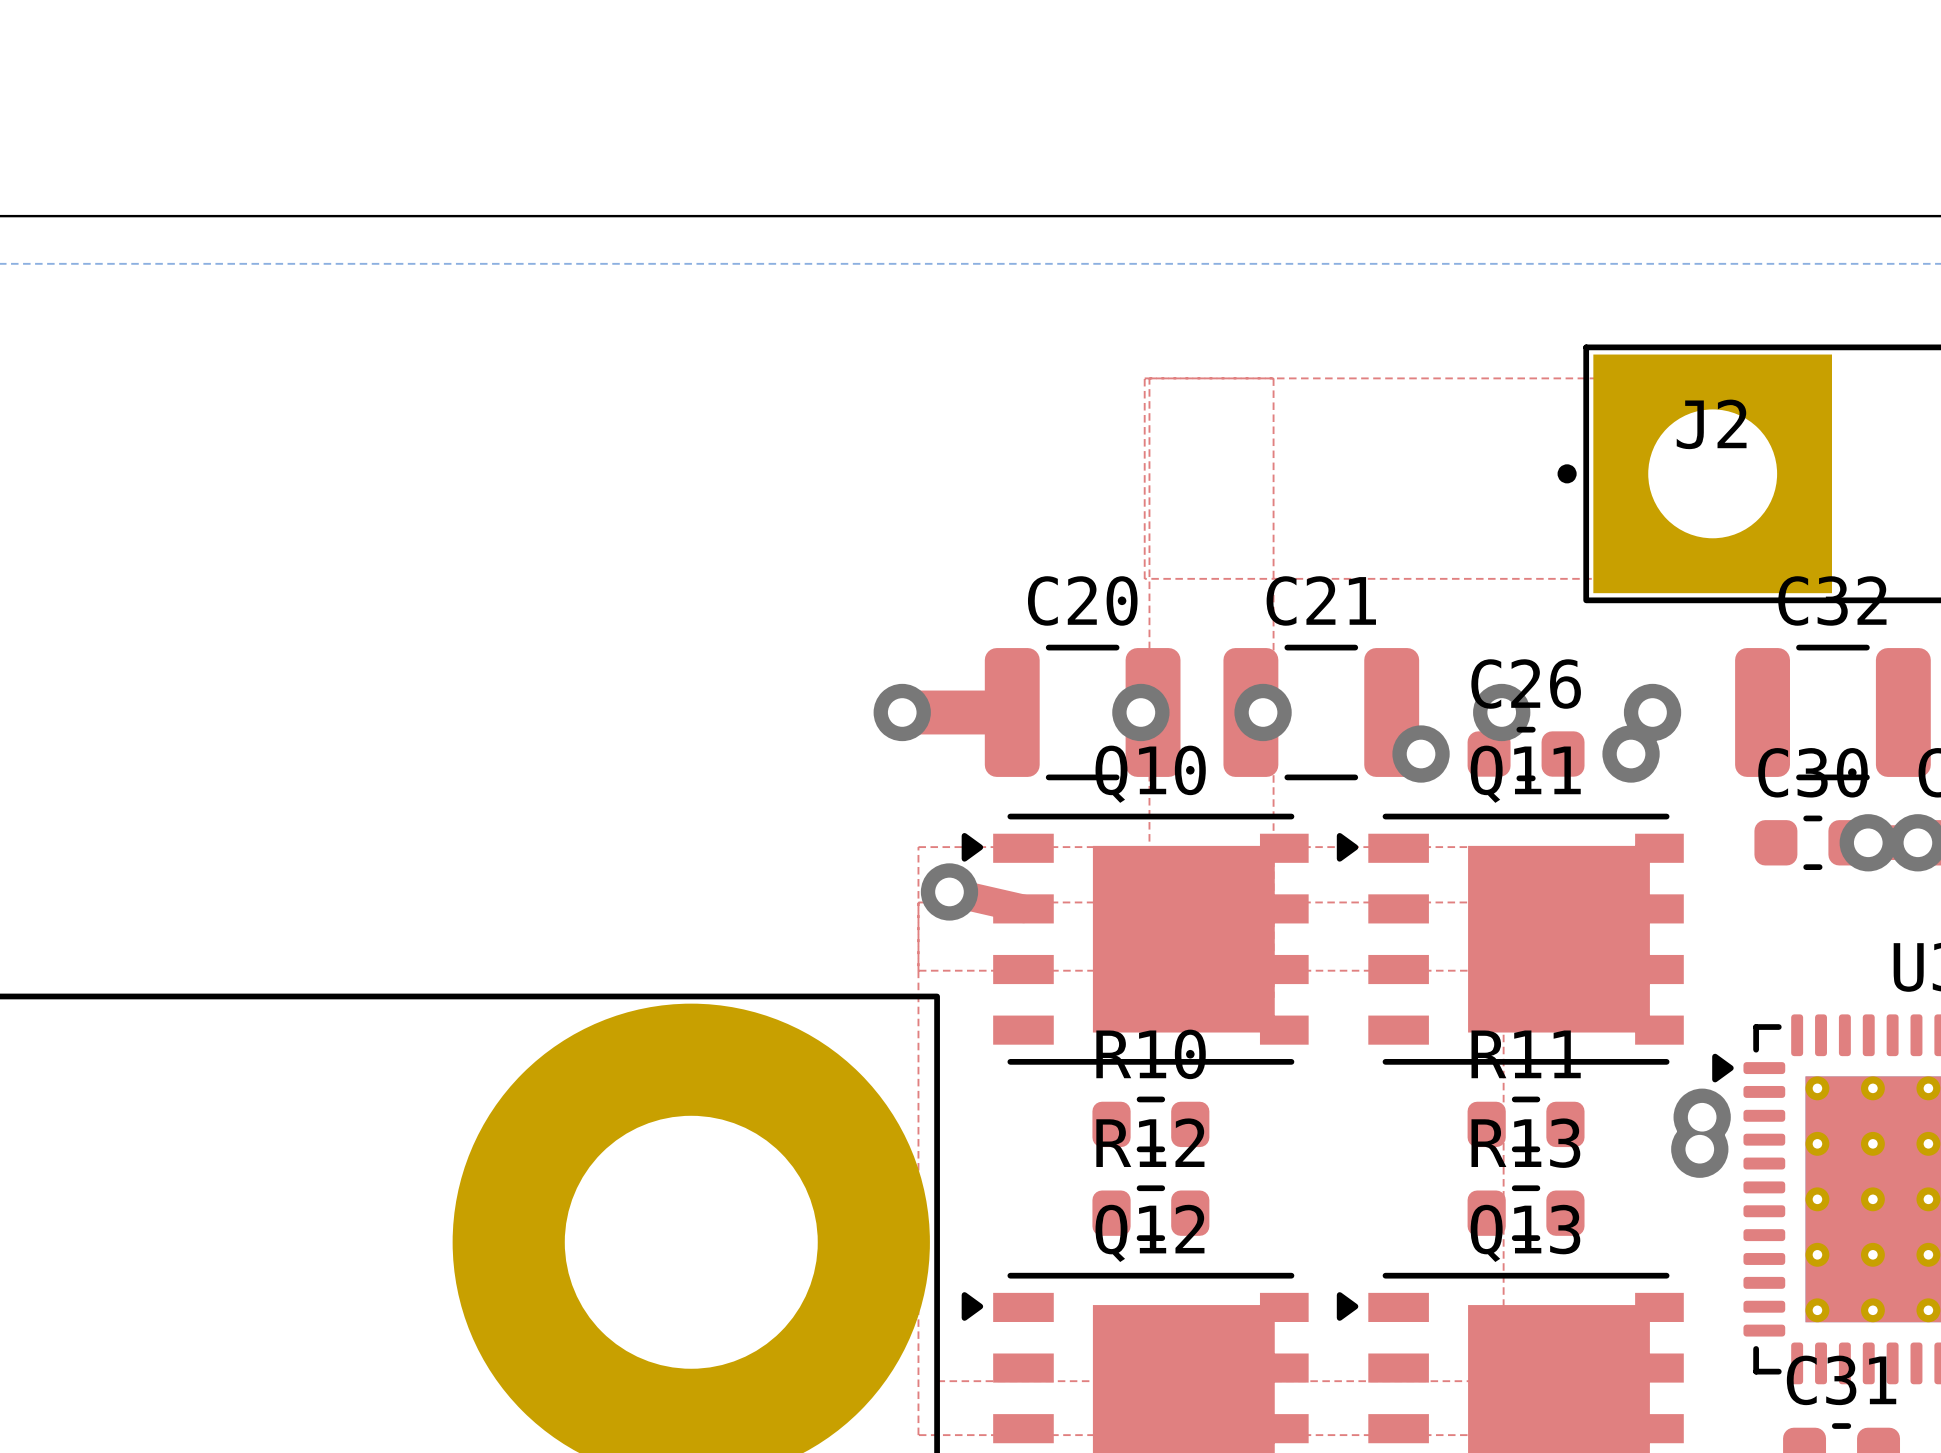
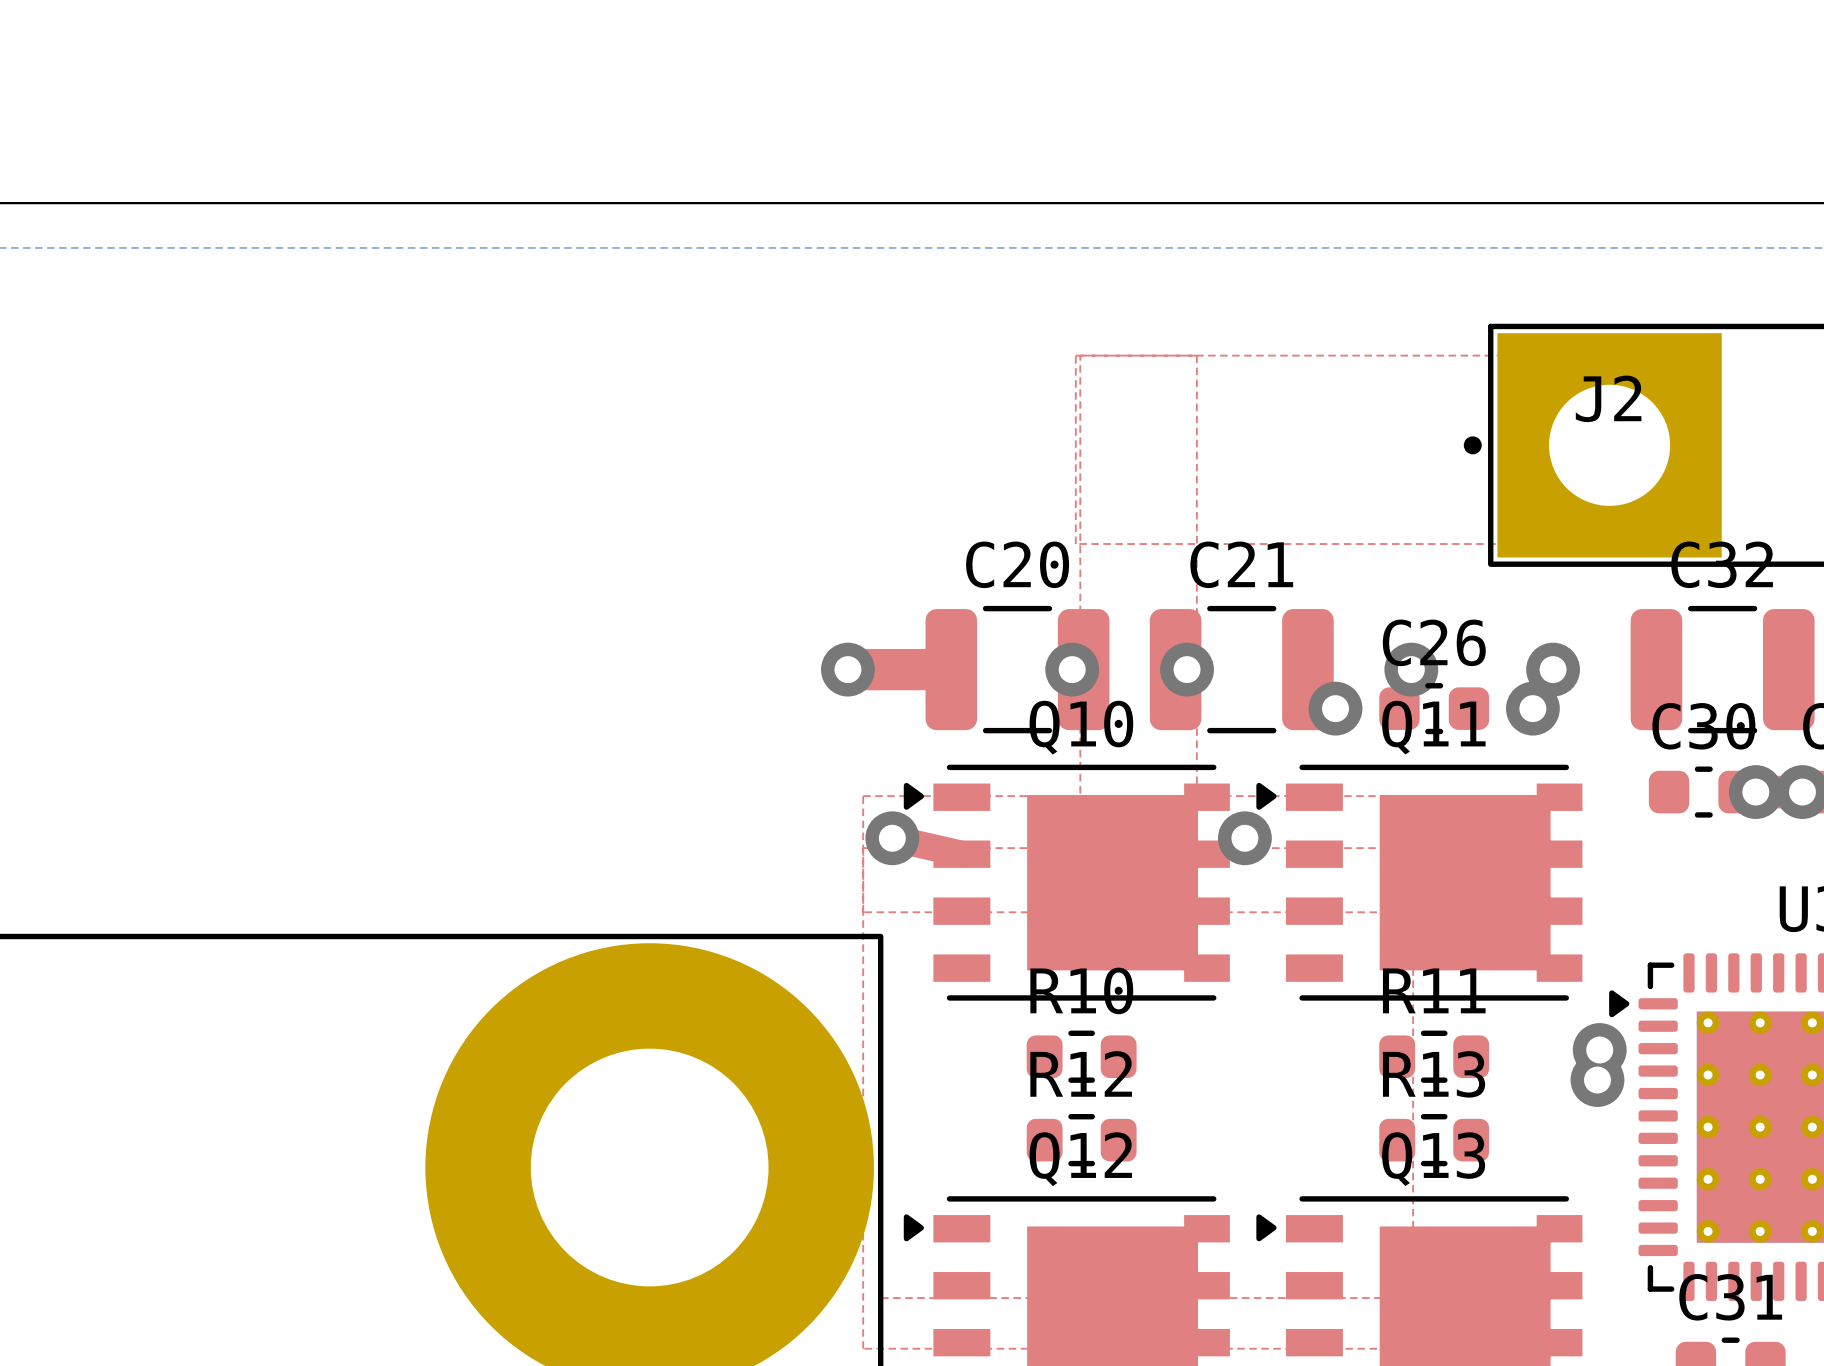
via: none -> (1244, 838)

